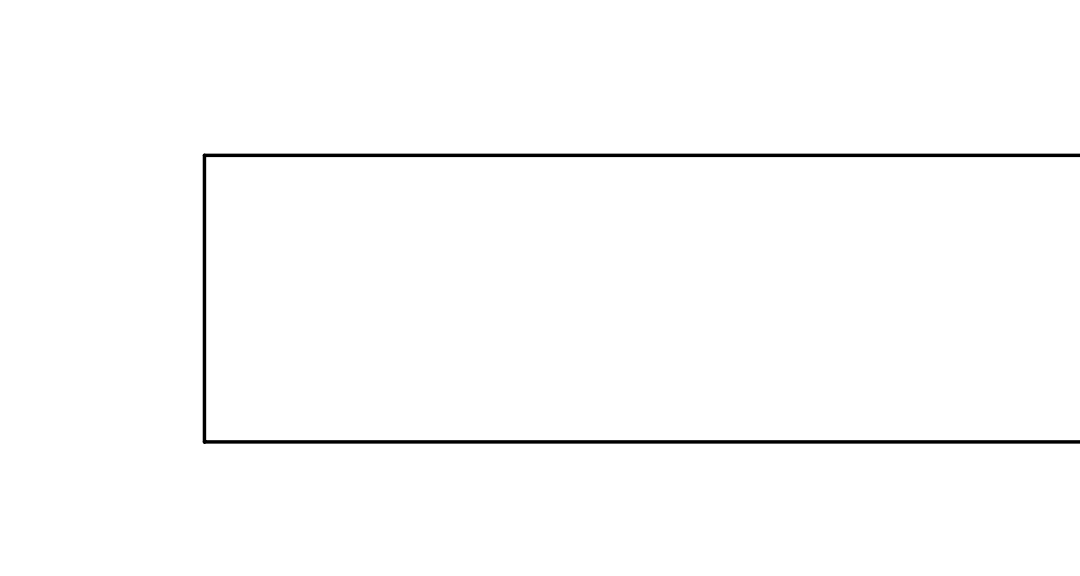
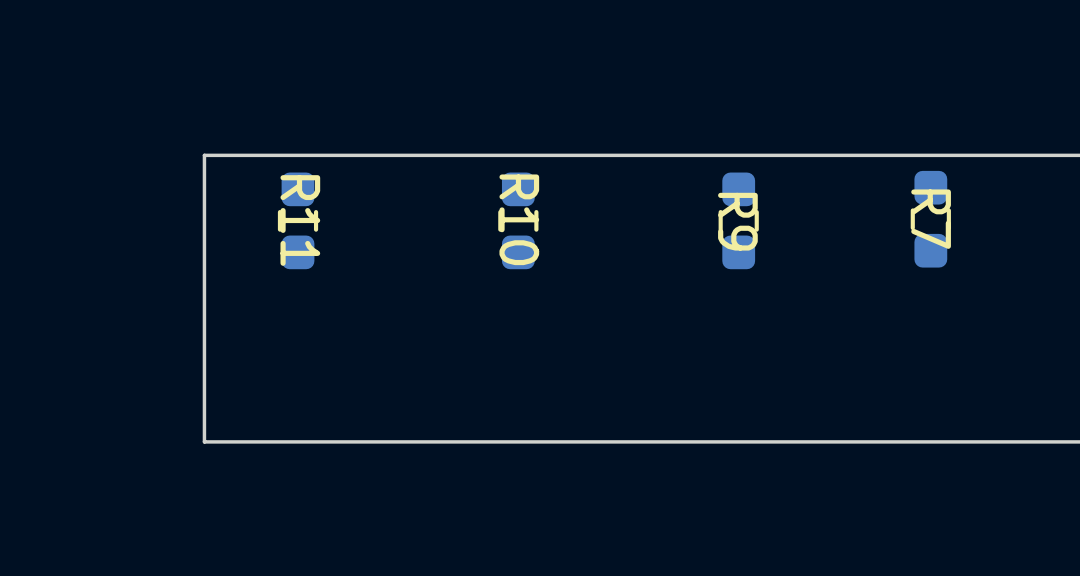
R7: none -> (930, 219)
R11: none -> (298, 220)
R10: none -> (518, 220)
R9: none -> (738, 220)

